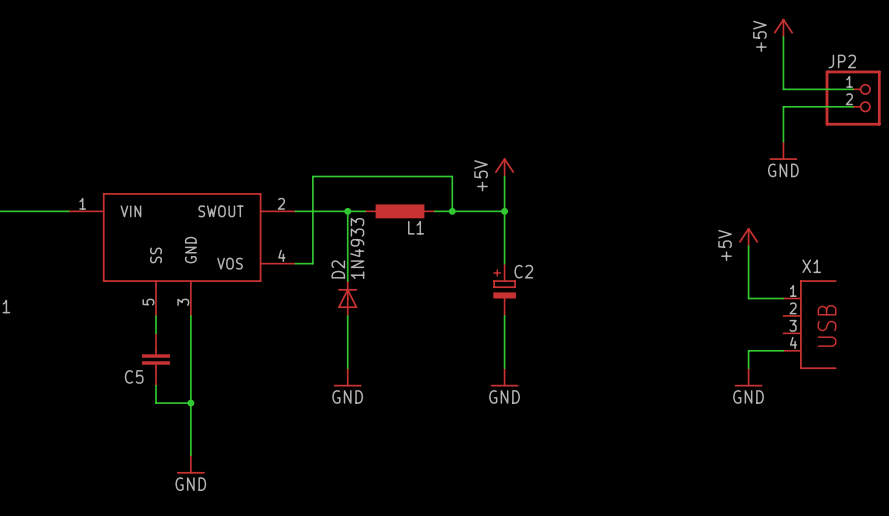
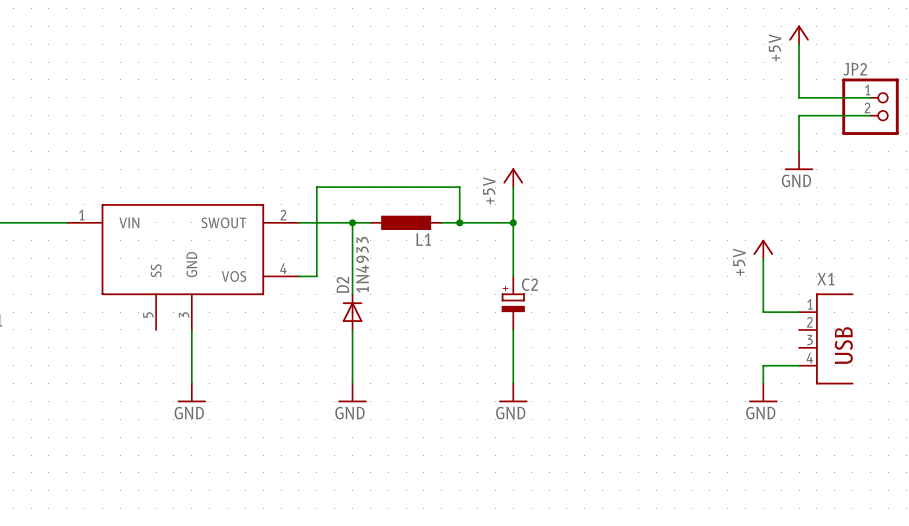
wire: (156, 315) (156, 333) -> none
C5: (156, 359) -> none
wire: (190, 368) (190, 455) -> none
wire: (156, 385) (156, 403) (190, 403) -> none
junction: (190, 403) -> none
power symbol position: GND (190, 464) -> GND (191, 392)

